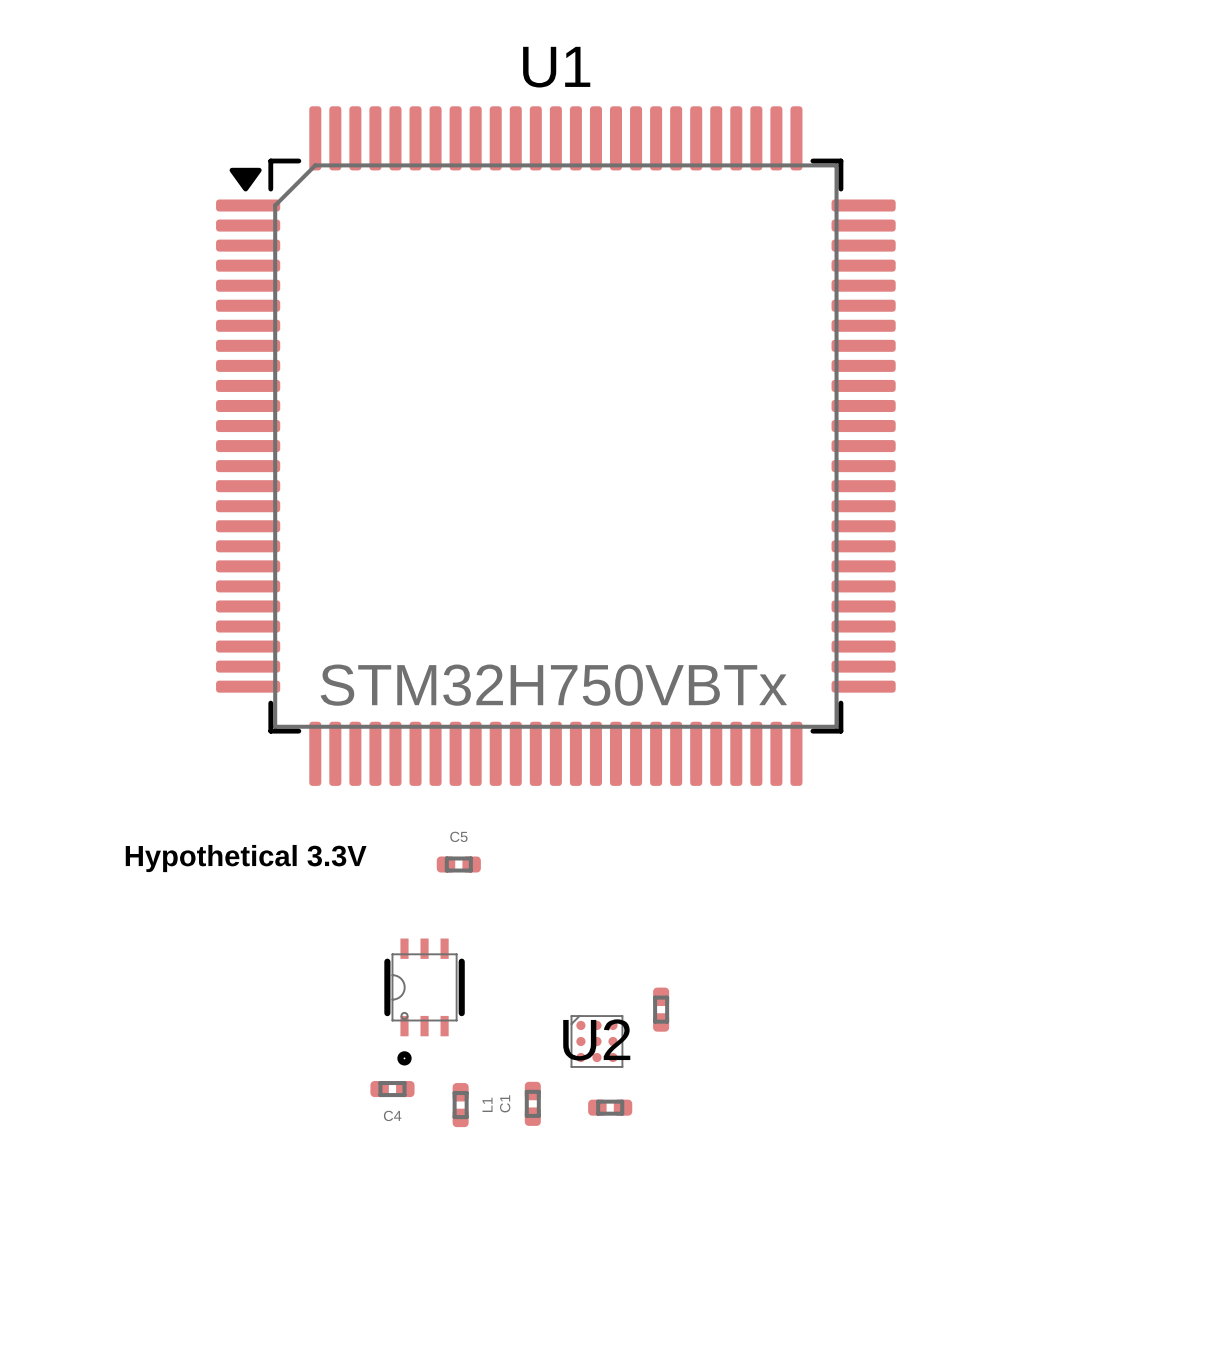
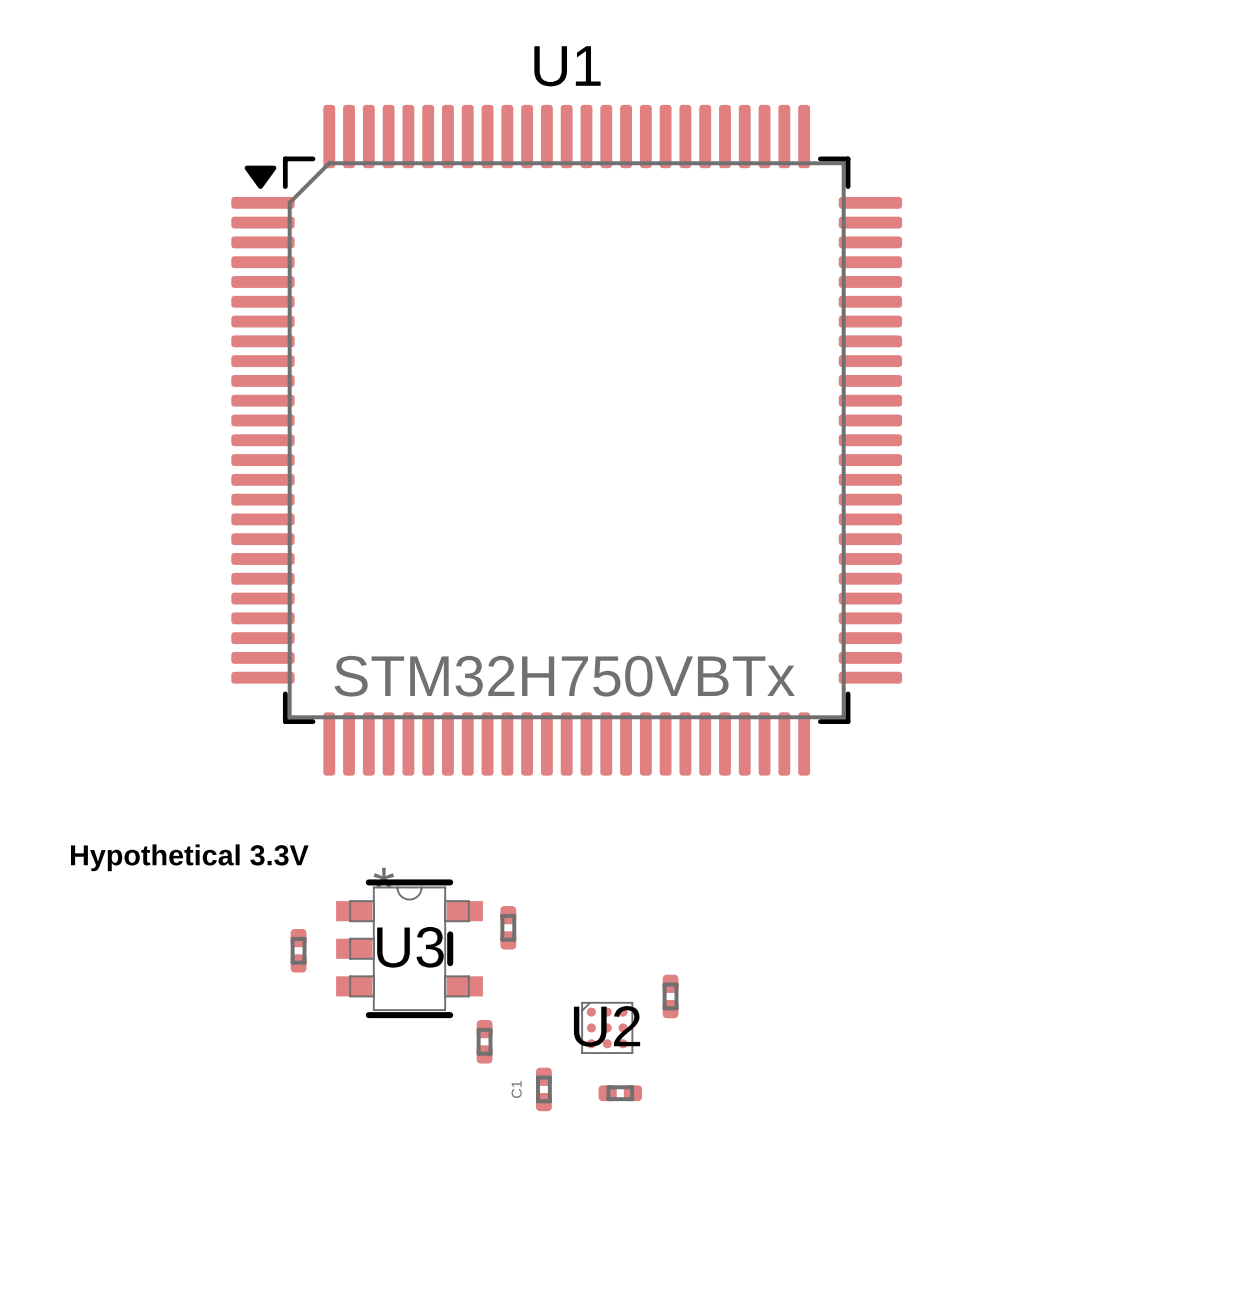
text position: Hypothetical 3.3V (246, 858) -> Hypothetical 3.3V (189, 857)
C5: (458, 864) -> none
part: none -> (508, 927)
U3: none -> (409, 948)
part: none -> (298, 950)
part: (424, 1002) -> none
part: none -> (484, 1041)
C4: (392, 1089) -> none
L1: (460, 1105) -> none

